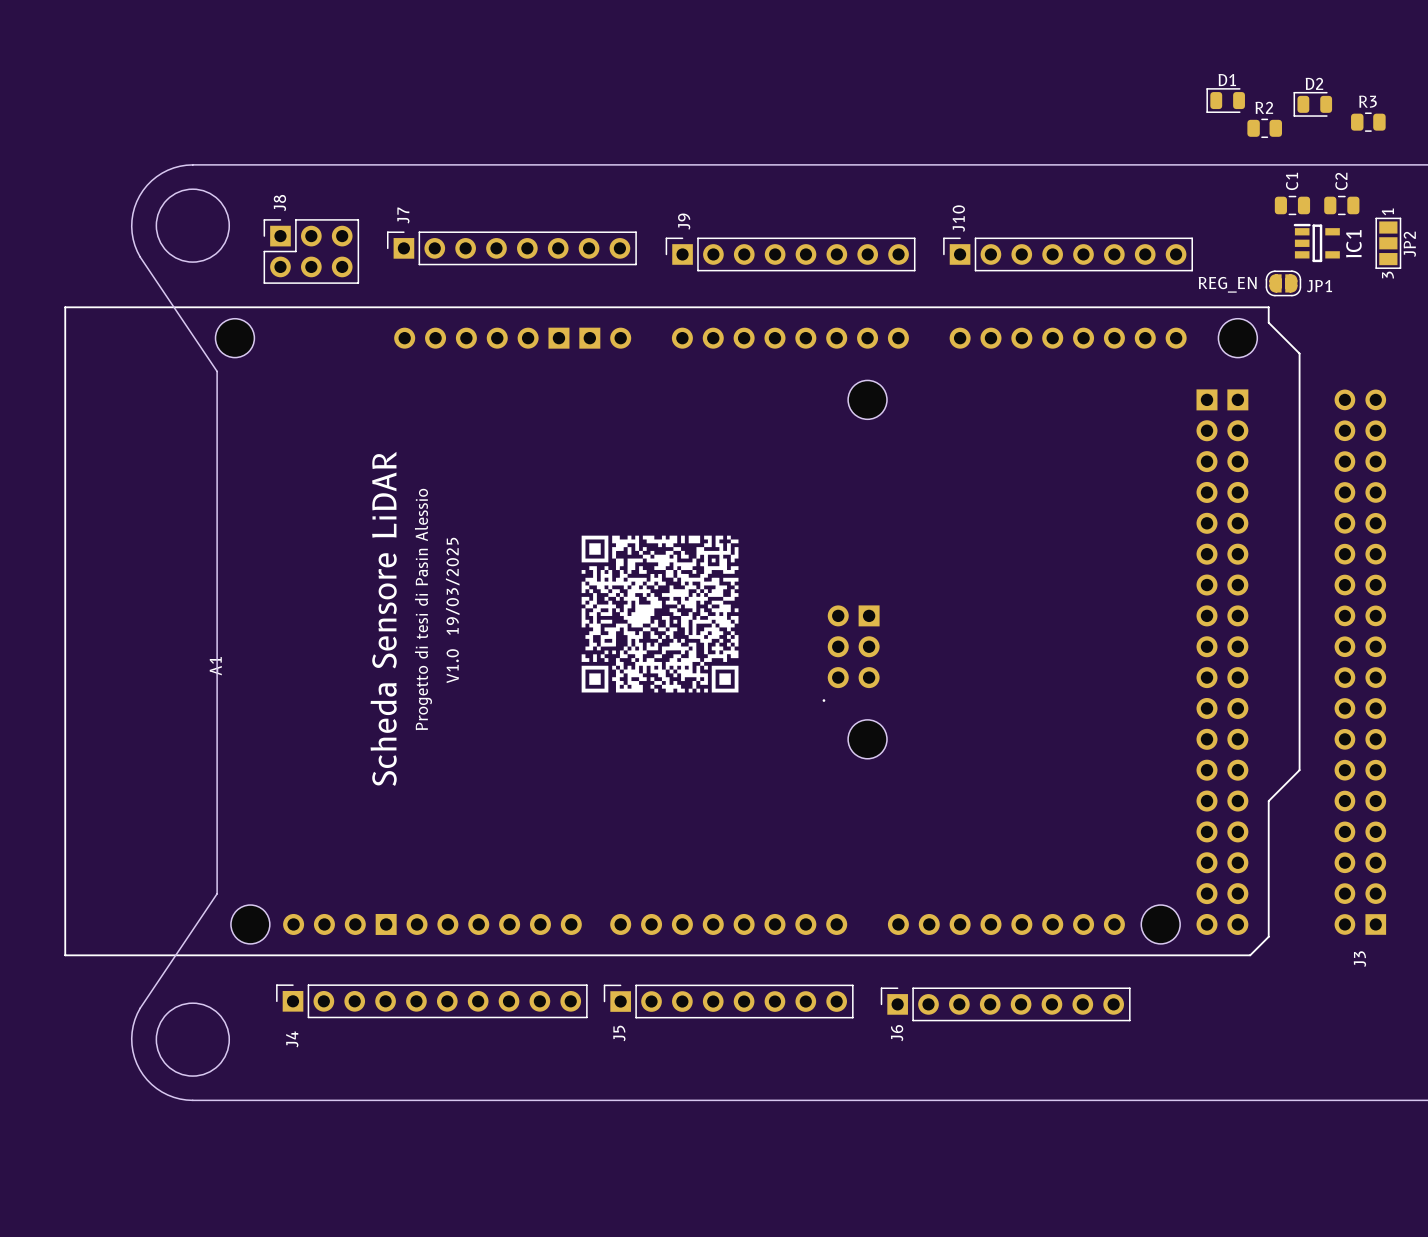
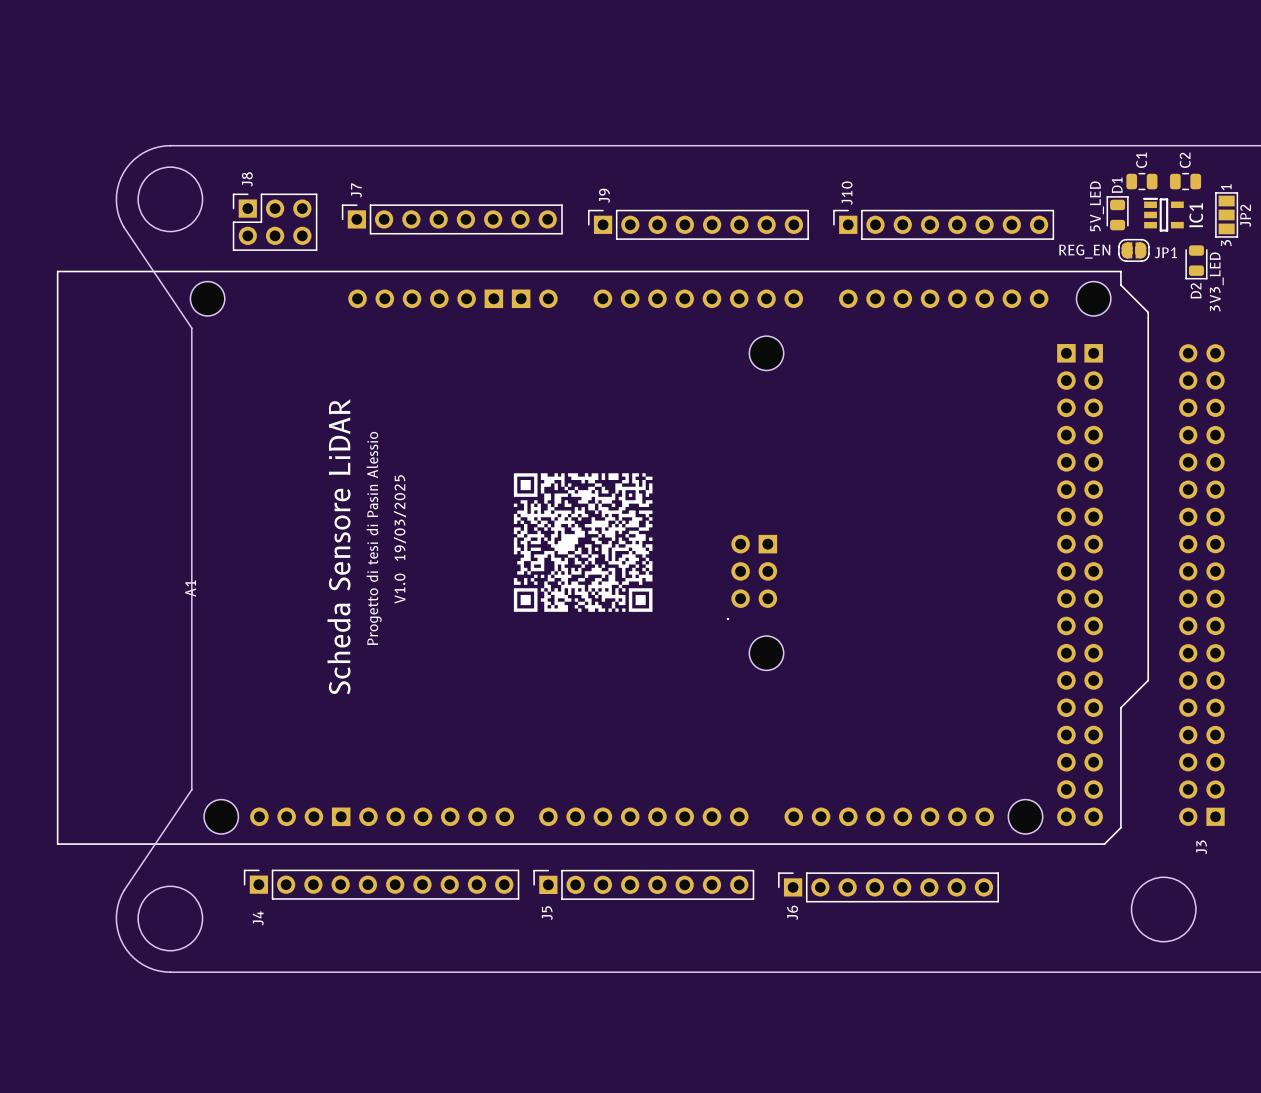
D2 name position: D2 (1314, 83) -> D2 (1196, 290)
D1 rotation: 0° (1225, 100) -> 90° clockwise (1117, 213)
D1 position: (1225, 100) -> (1117, 213)
D2 rotation: 0° (1312, 104) -> 90° counterclockwise (1196, 262)
D2 position: (1312, 104) -> (1196, 262)
R3: (1368, 122) -> none
R2: (1264, 128) -> none
D1 value: none -> 5V_LED (1096, 206)
D2 value: none -> 3V3_LED (1216, 281)
round board edge: none -> [1130, 876, 1197, 943]

